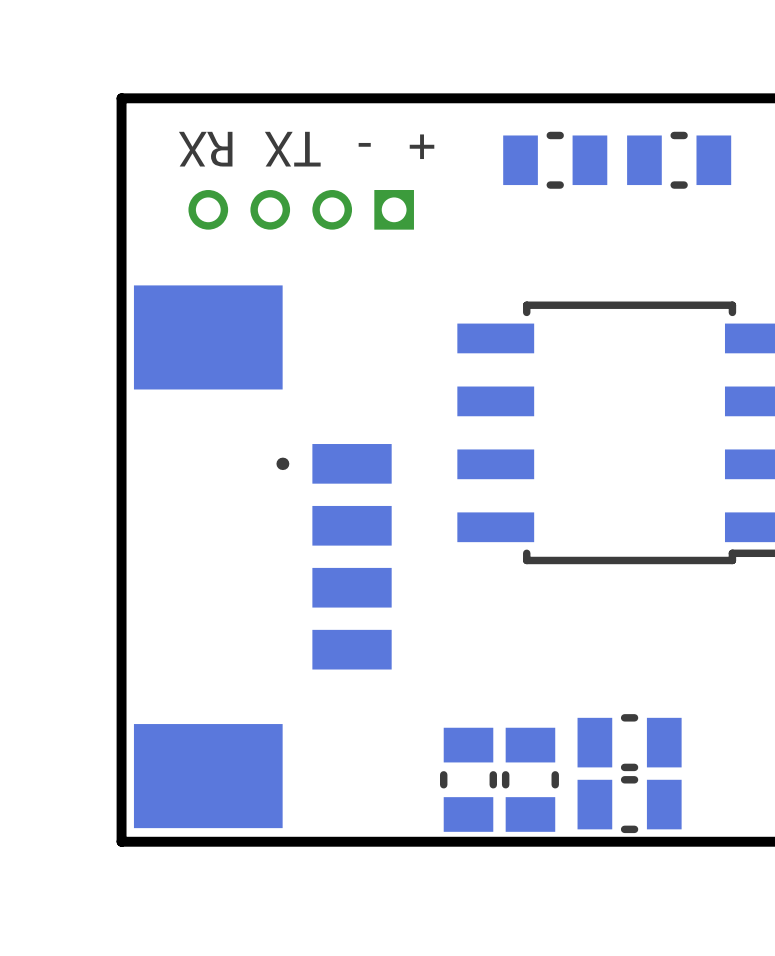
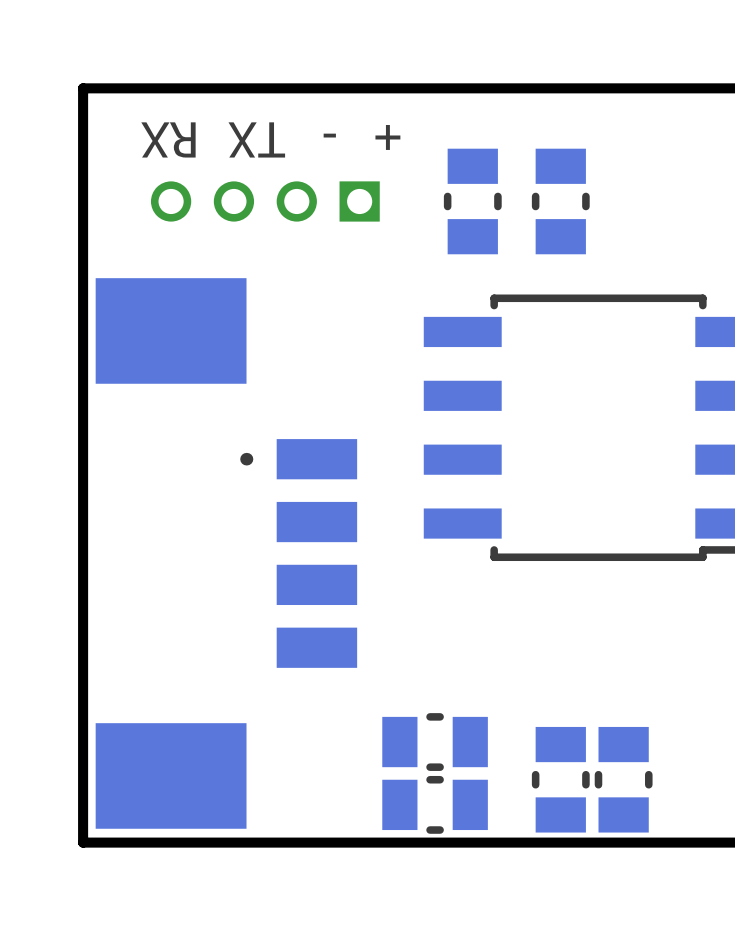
part: (555, 160) -> none
part: (679, 160) -> none
part: none -> (472, 201)
part: none -> (560, 201)
part: none -> (435, 742)
part: (629, 742) -> none
part: (468, 779) -> none
part: (530, 779) -> none
part: none -> (560, 779)
part: none -> (623, 779)
part: none -> (435, 804)
part: (629, 804) -> none

